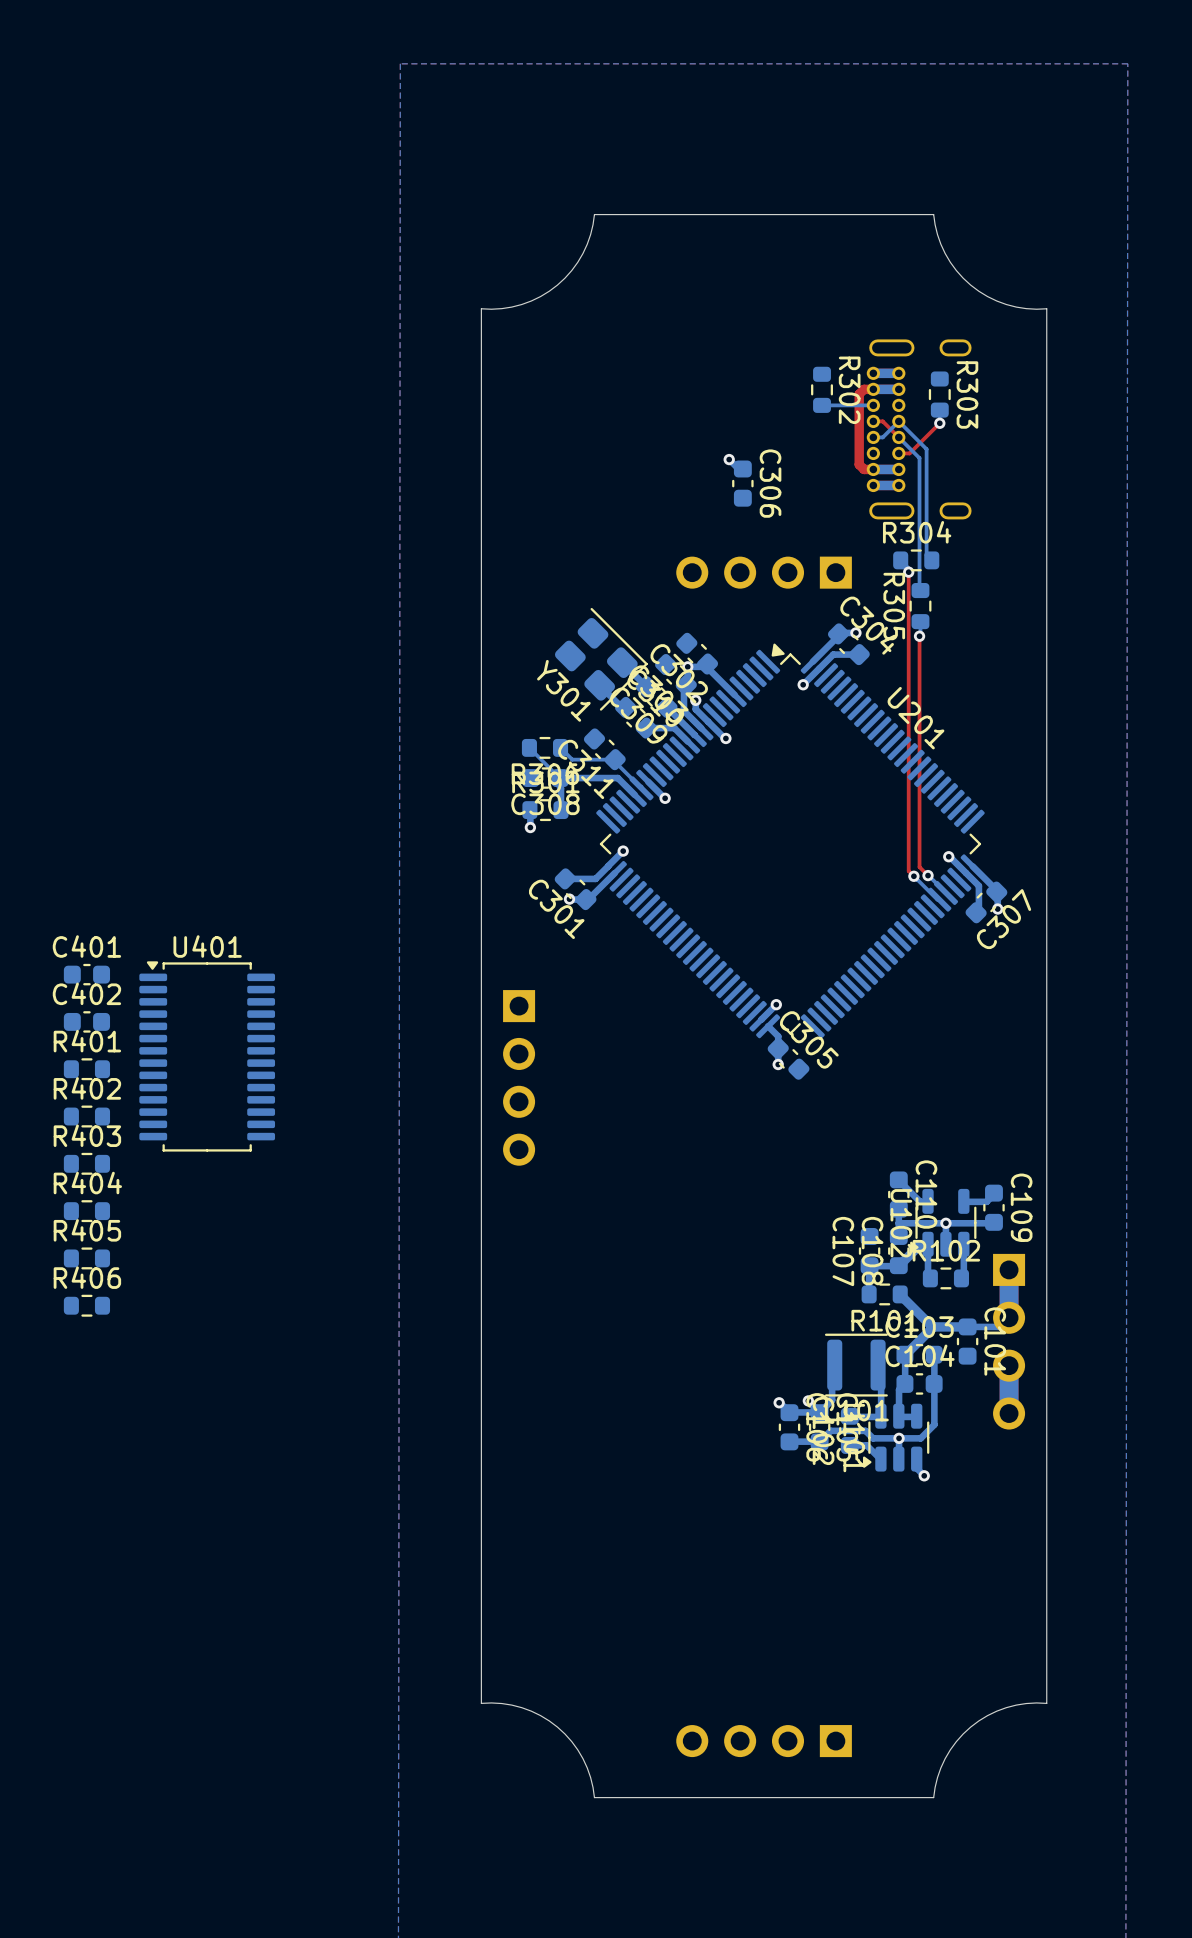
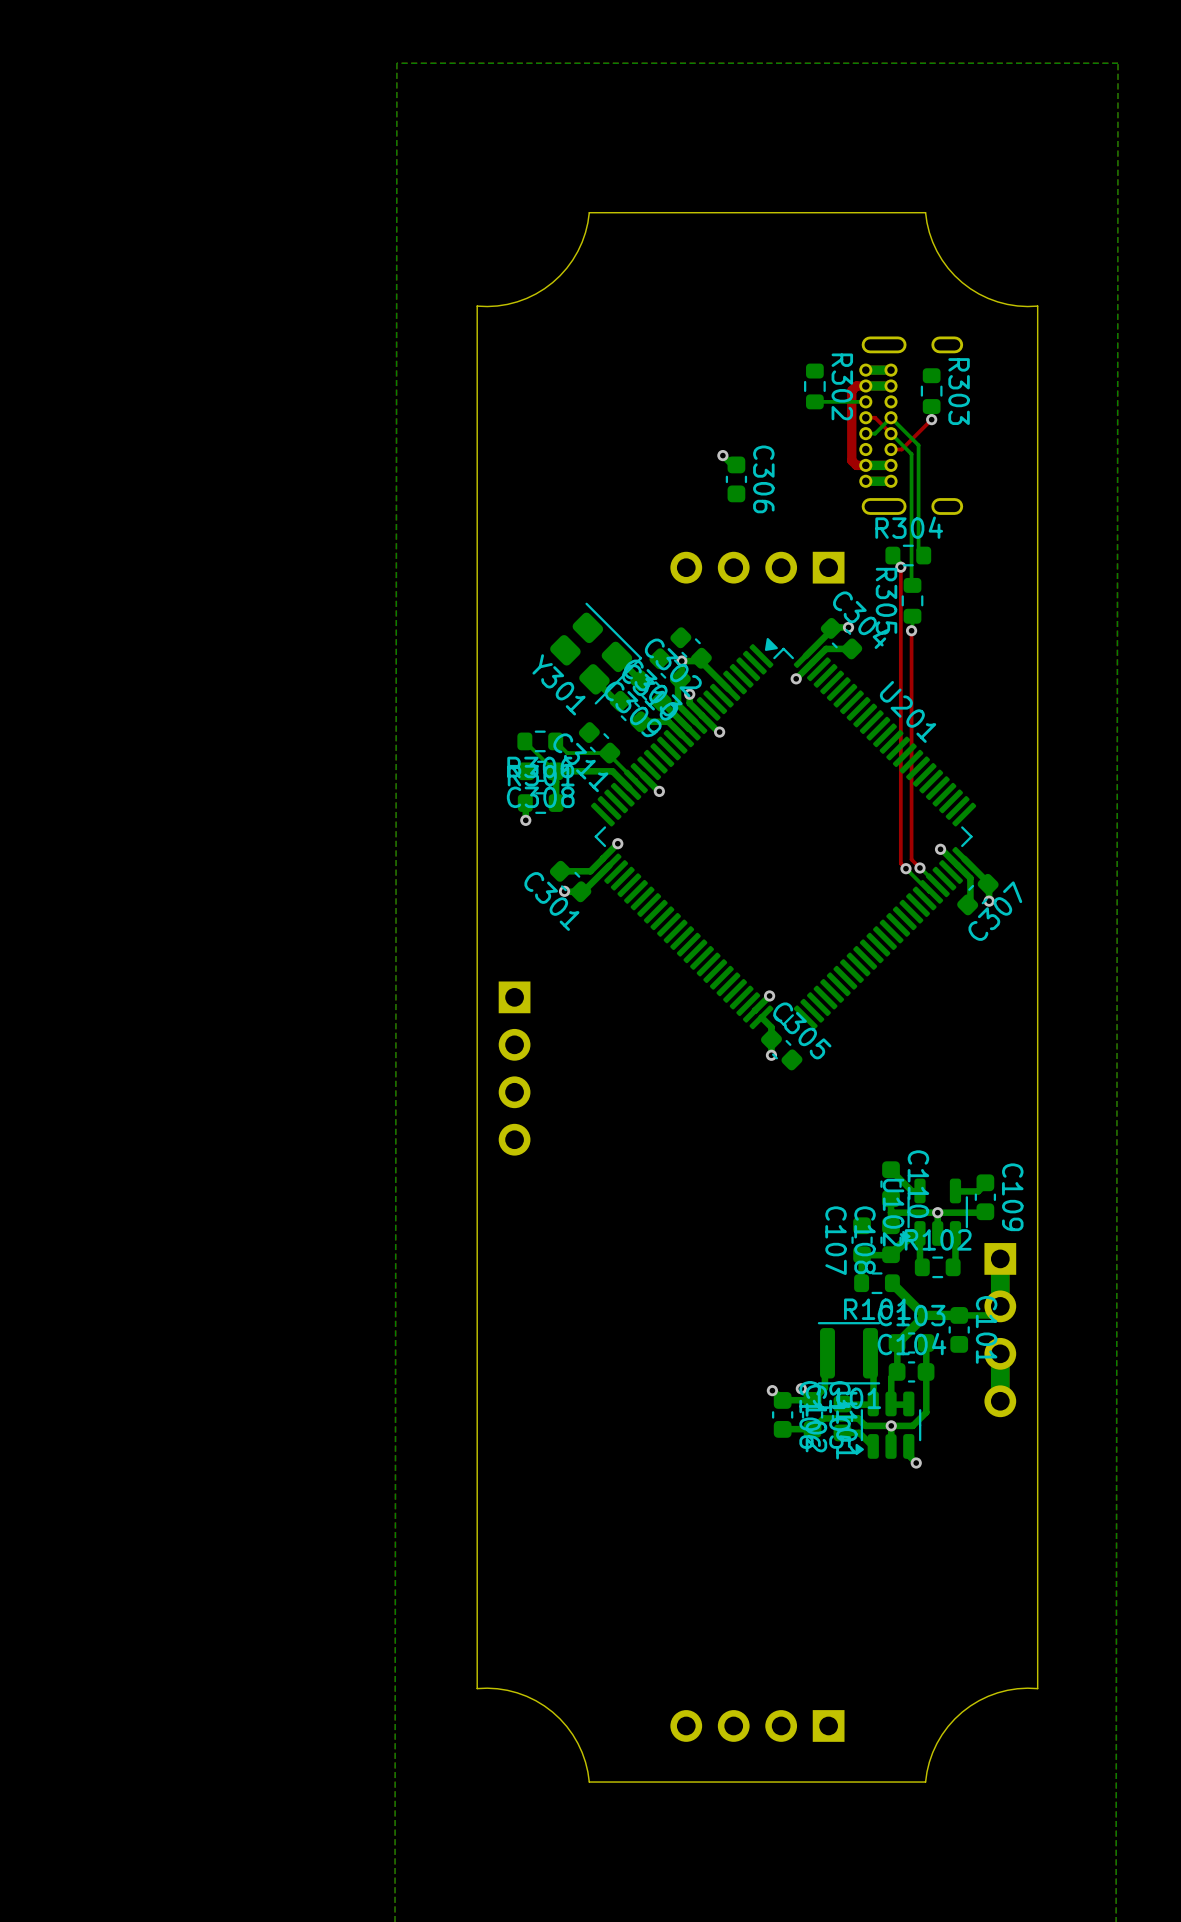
C401: (86, 974) -> none
C402: (86, 1021) -> none
U401: (207, 1056) -> none
R401: (86, 1069) -> none
R402: (86, 1116) -> none
R403: (86, 1163) -> none
R404: (86, 1211) -> none
R405: (86, 1258) -> none
R406: (86, 1305) -> none

